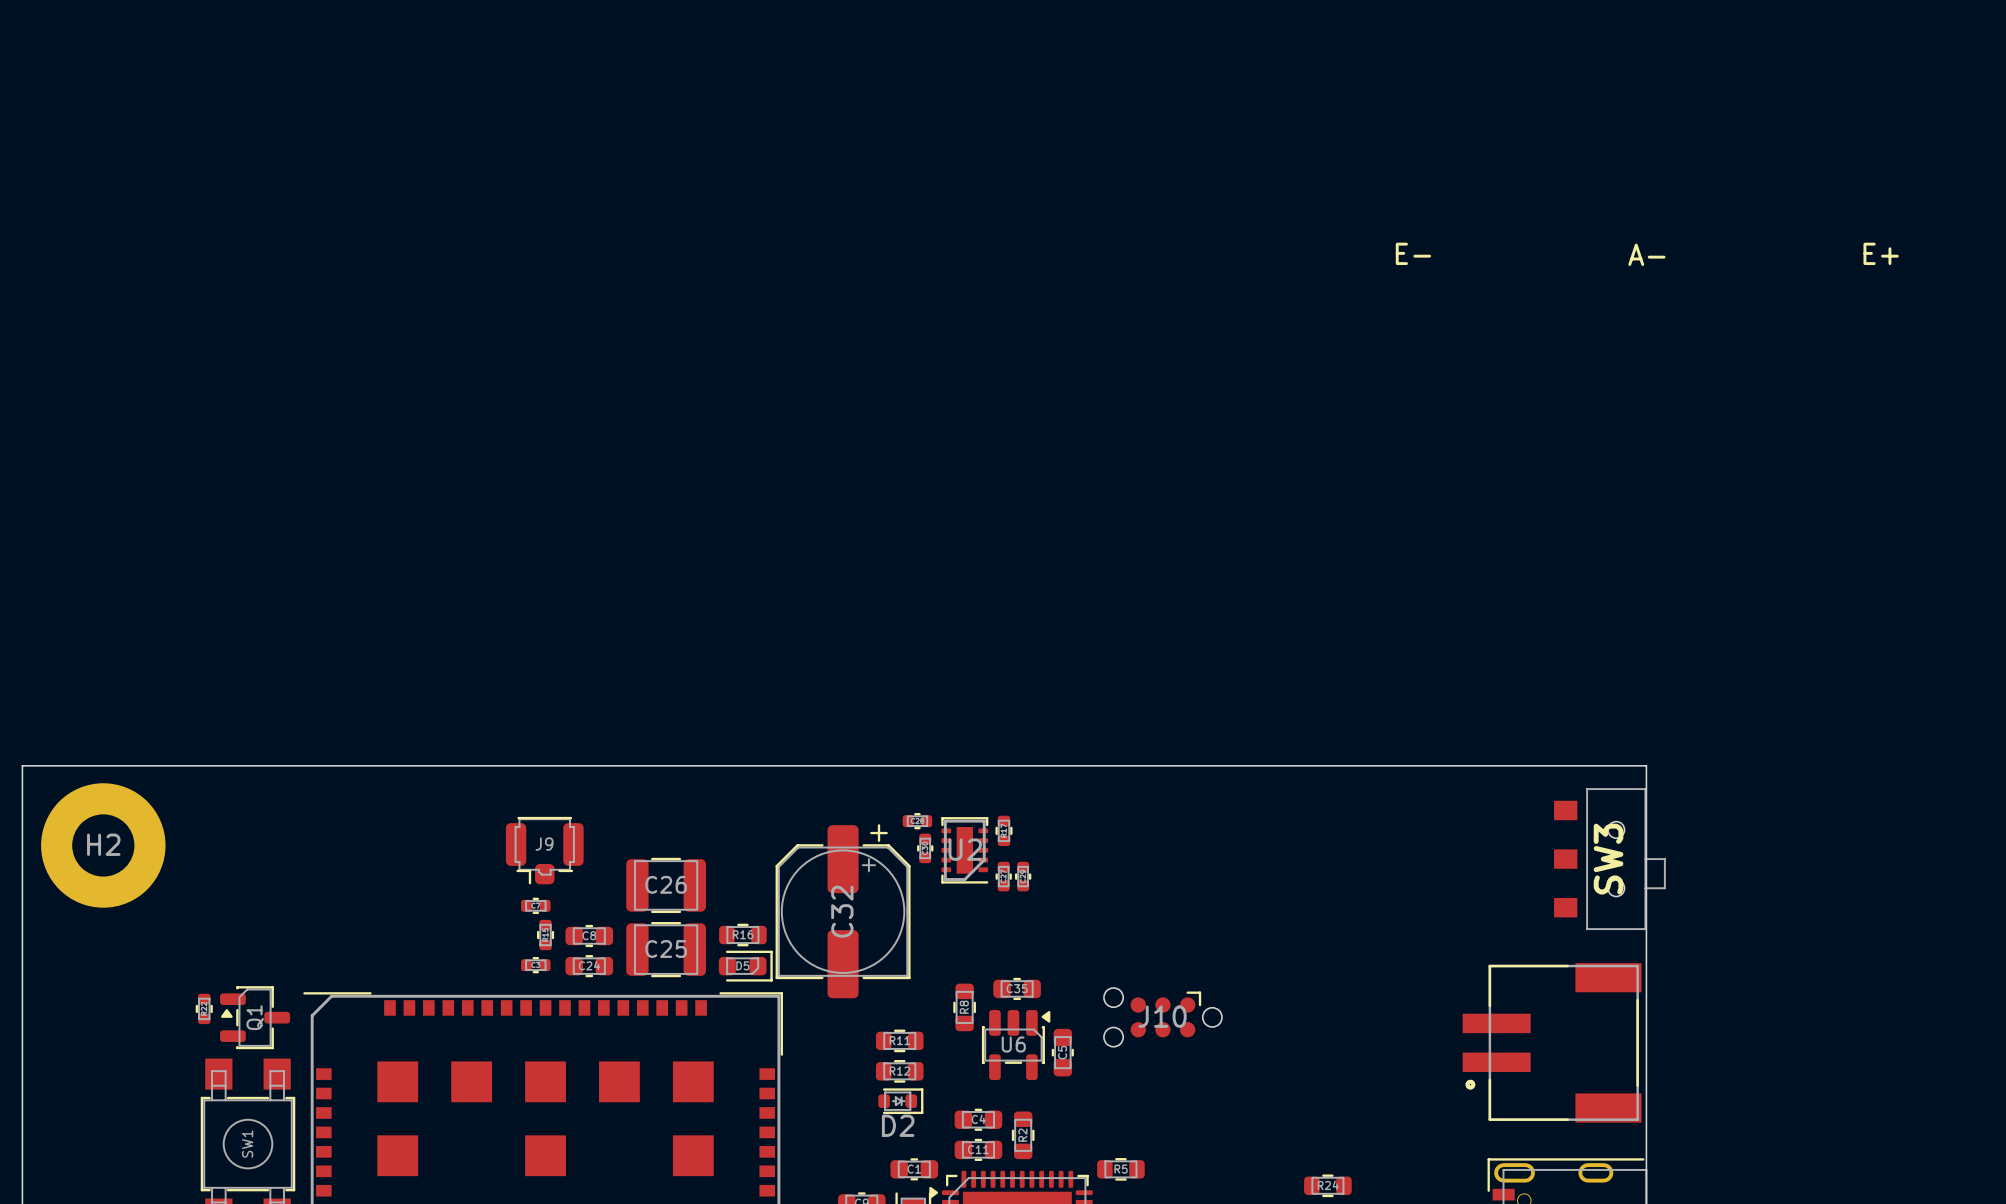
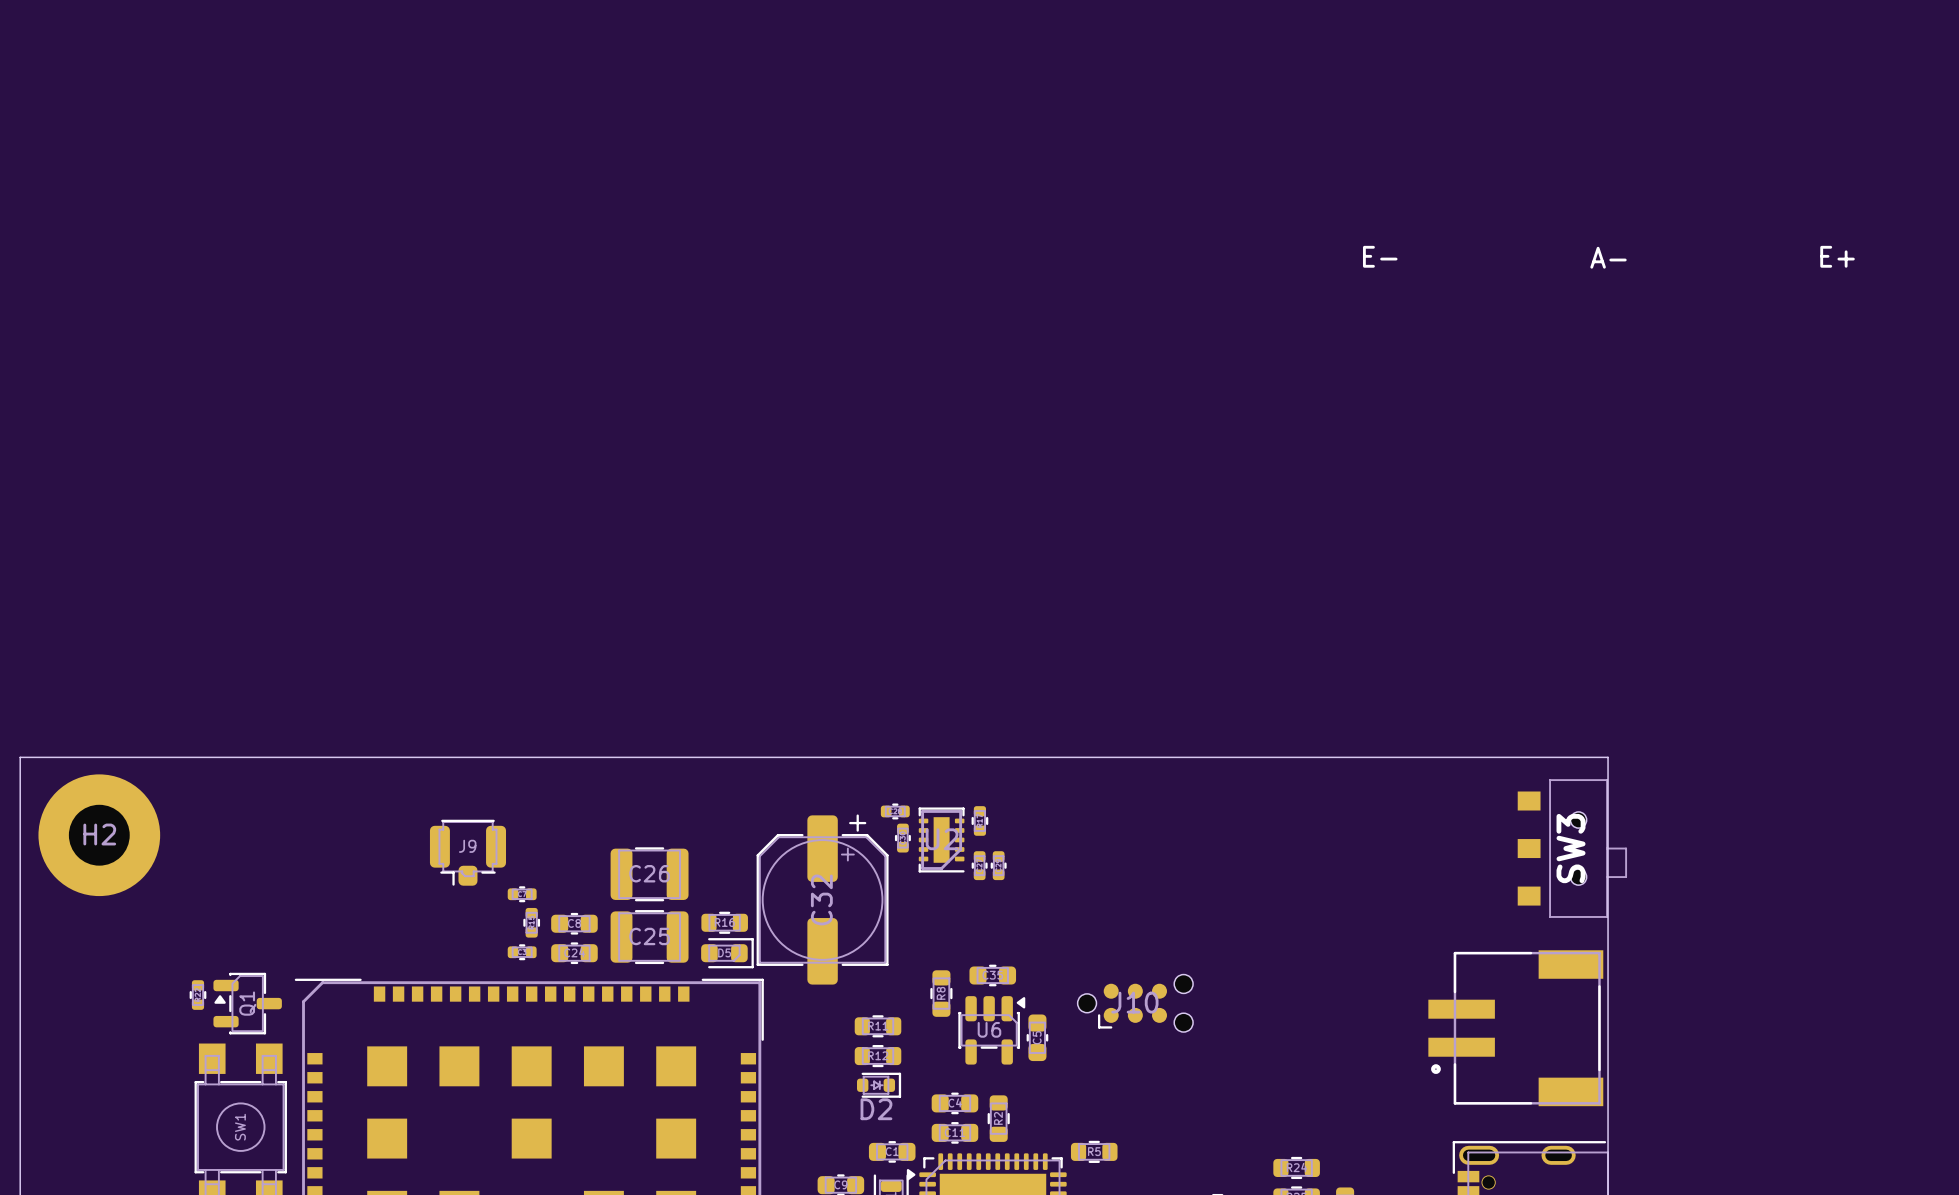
J9 position: (544, 850) -> (467, 852)
J10 rotation: 0° (1162, 1017) -> 180° (1135, 1003)

